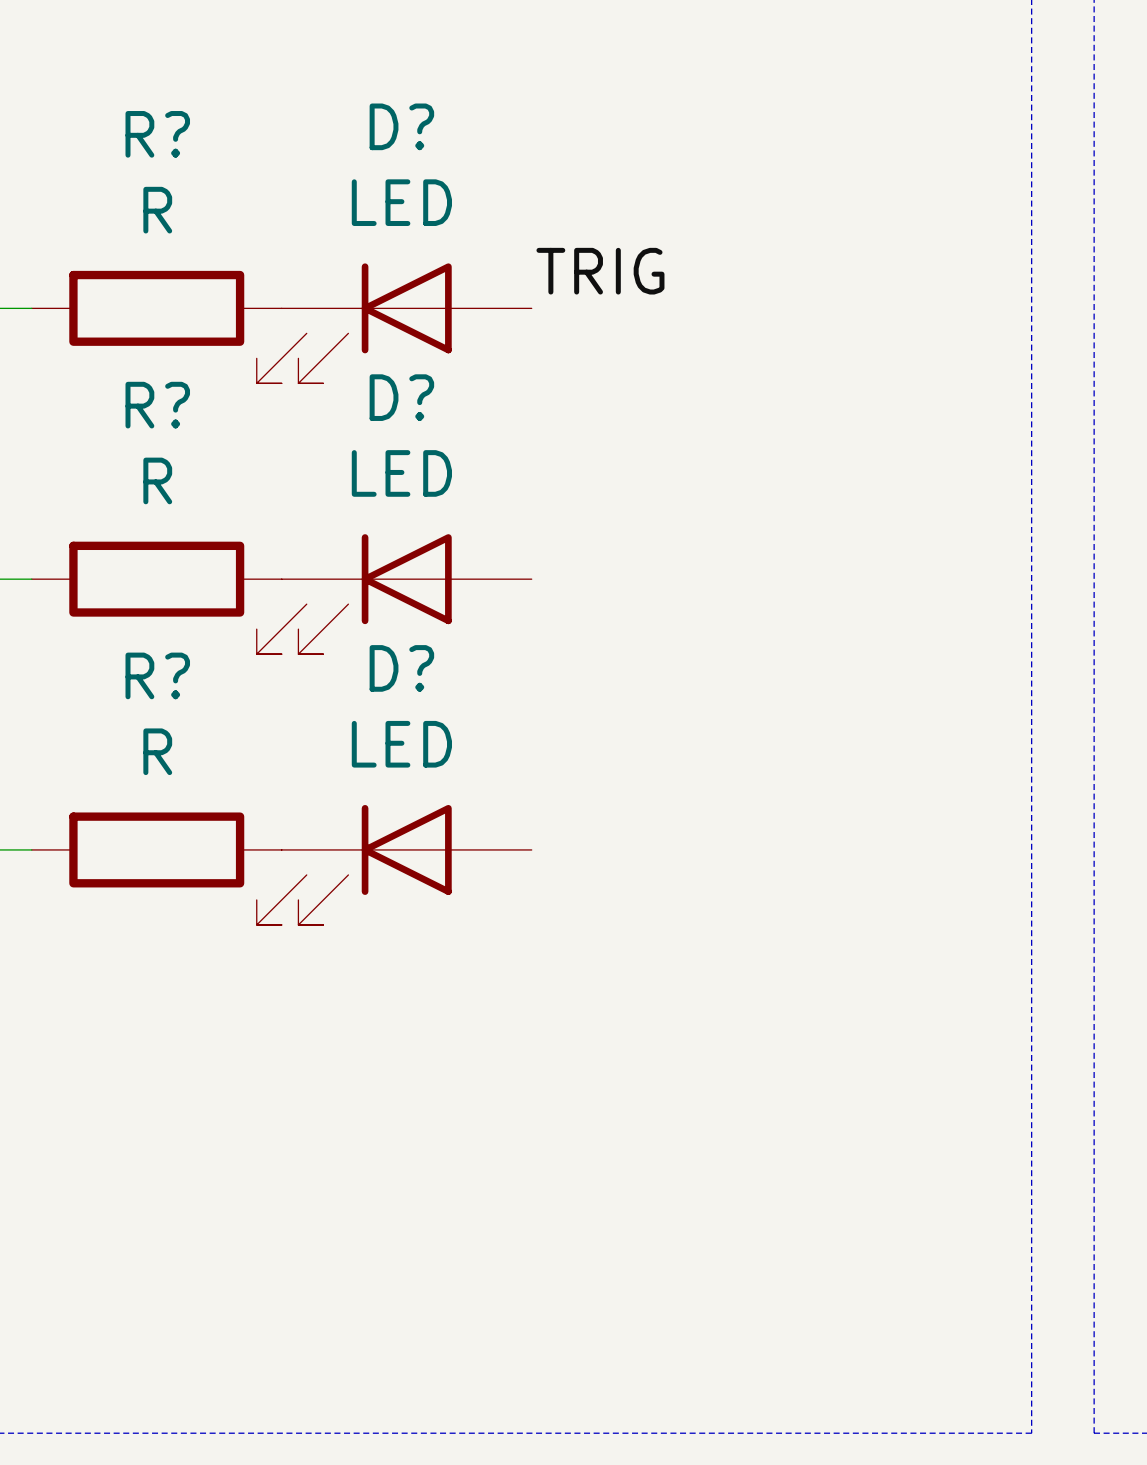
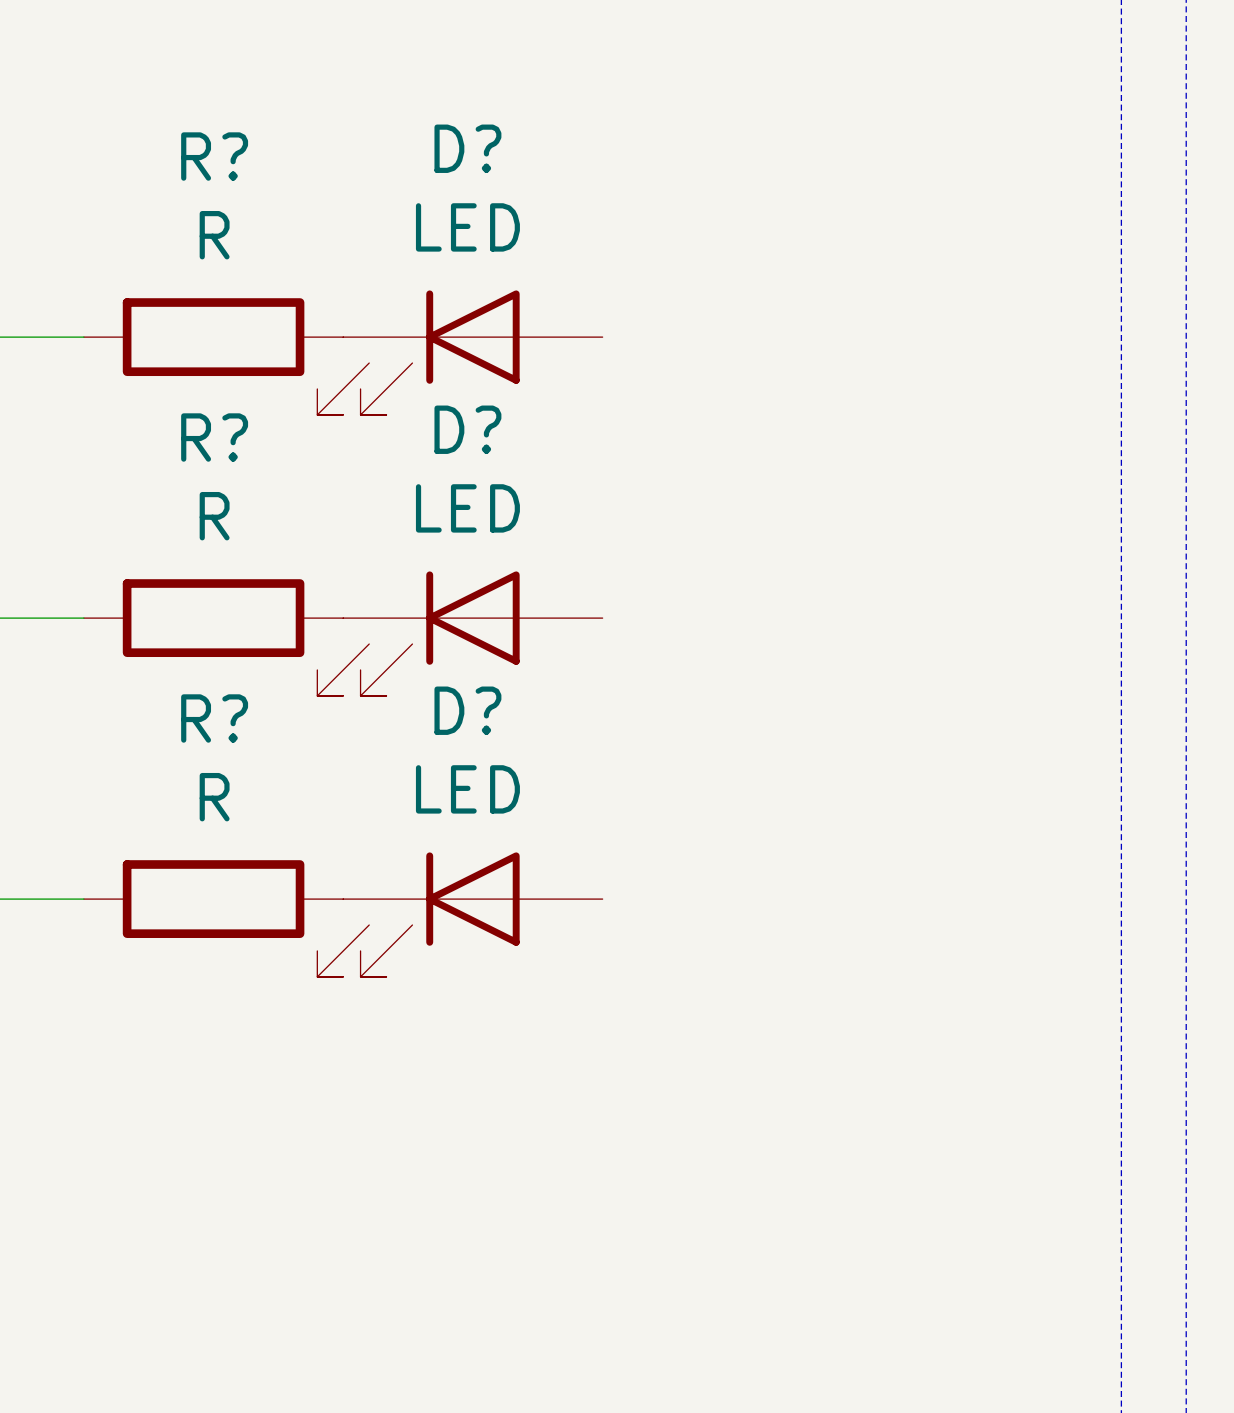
label: TRIG (600, 271) -> none

